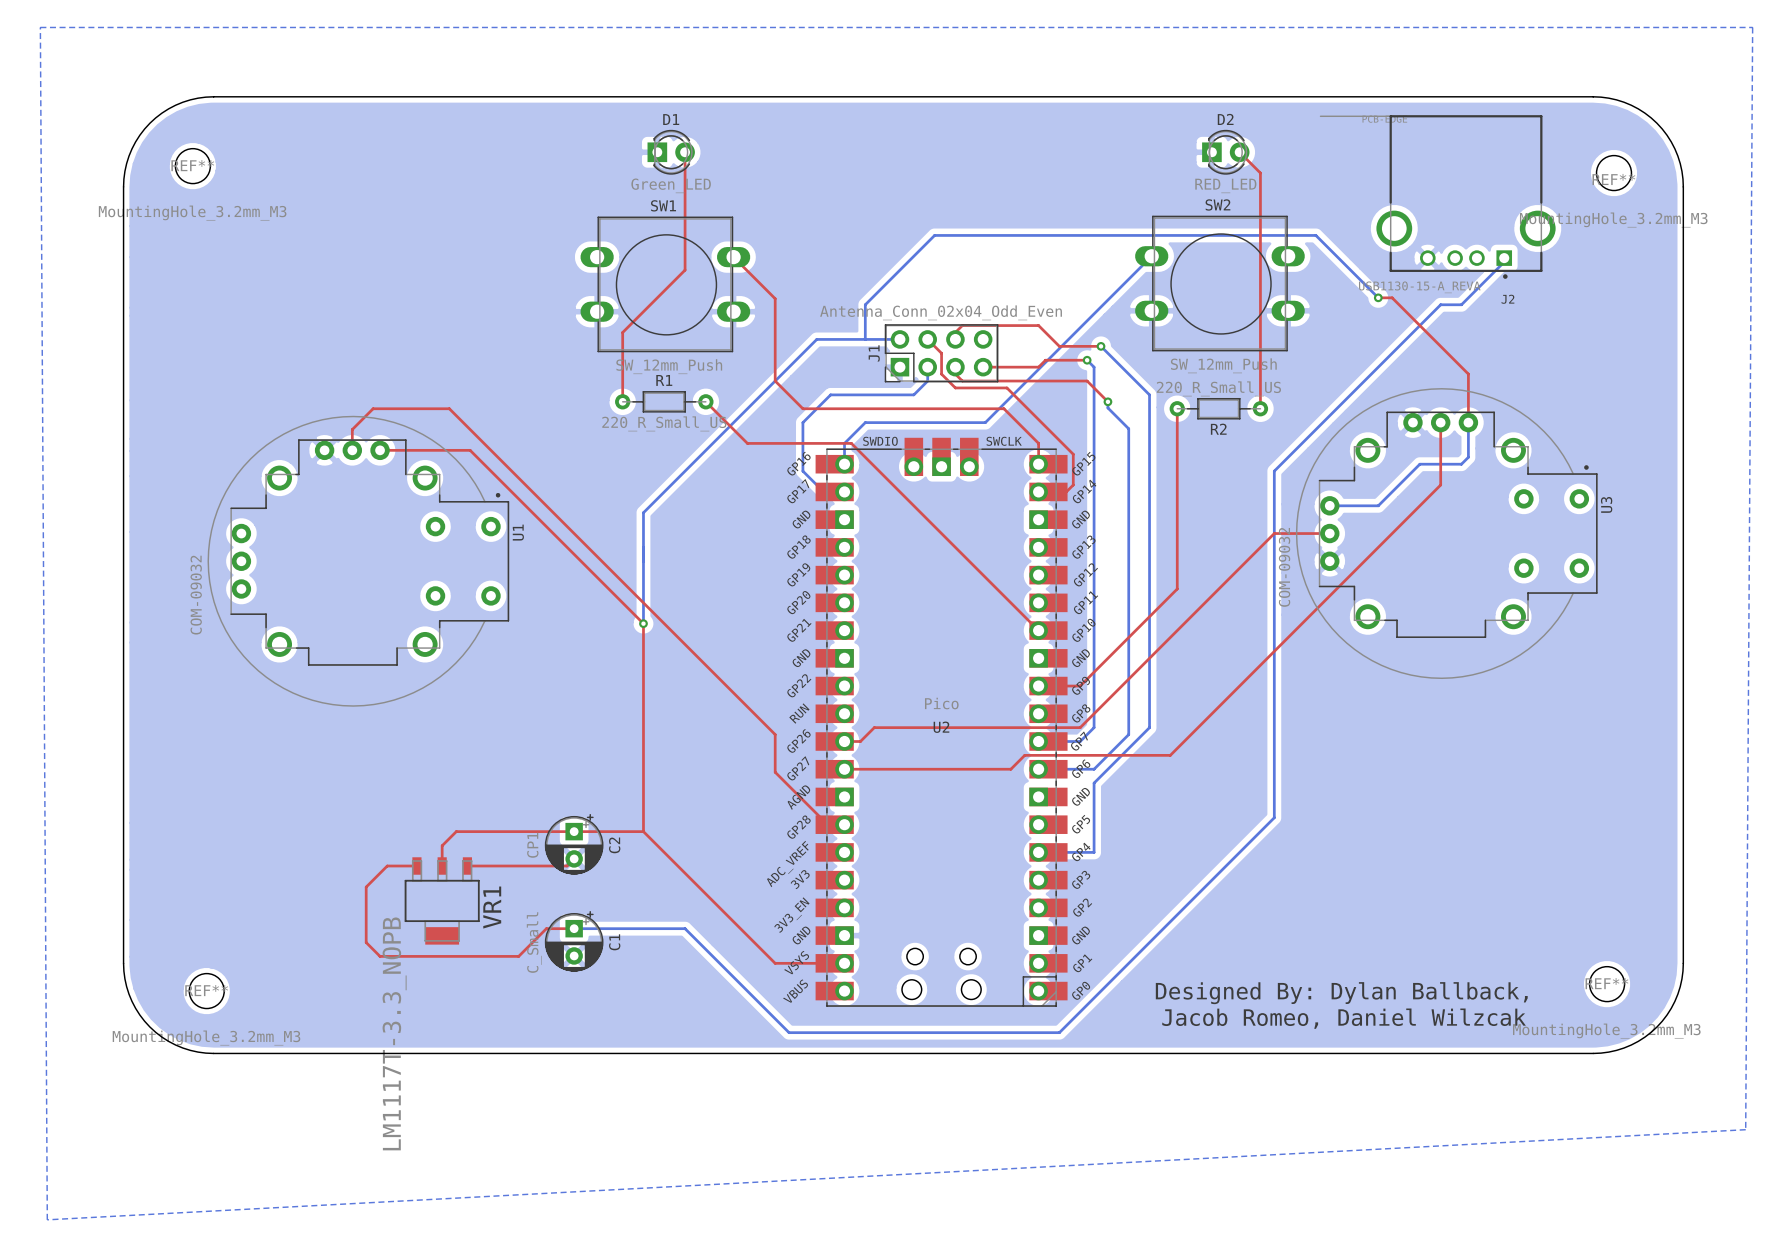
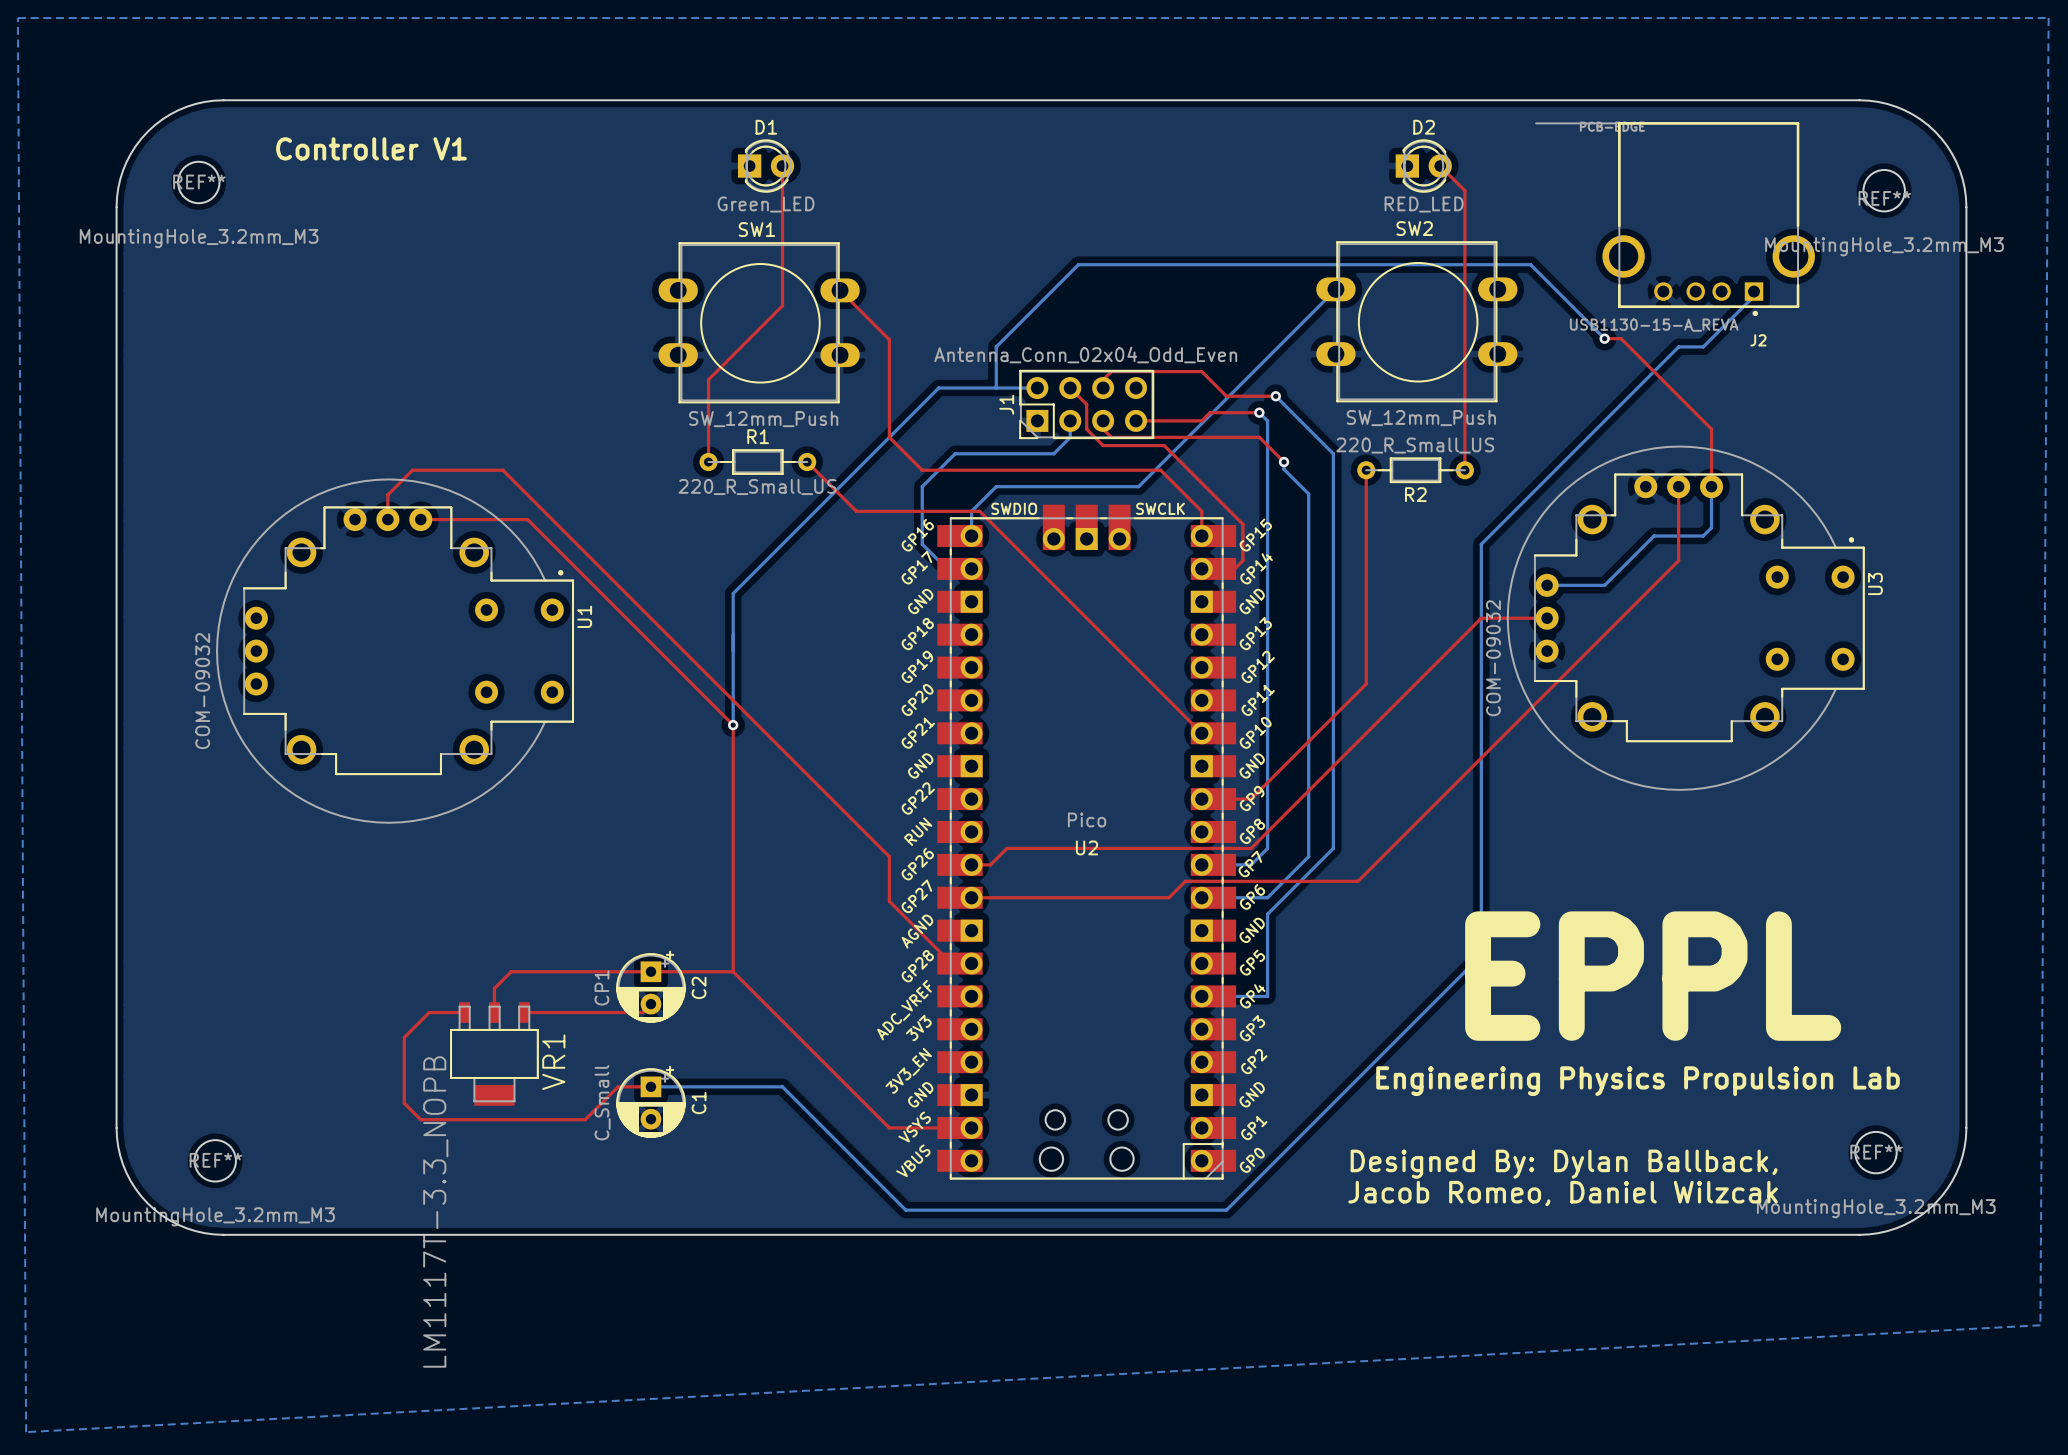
text: none -> Controller V1 (371, 148)
text: none -> EPPL (1653, 976)
text: none -> Engineering Physics Propulsion Lab (1638, 1081)

